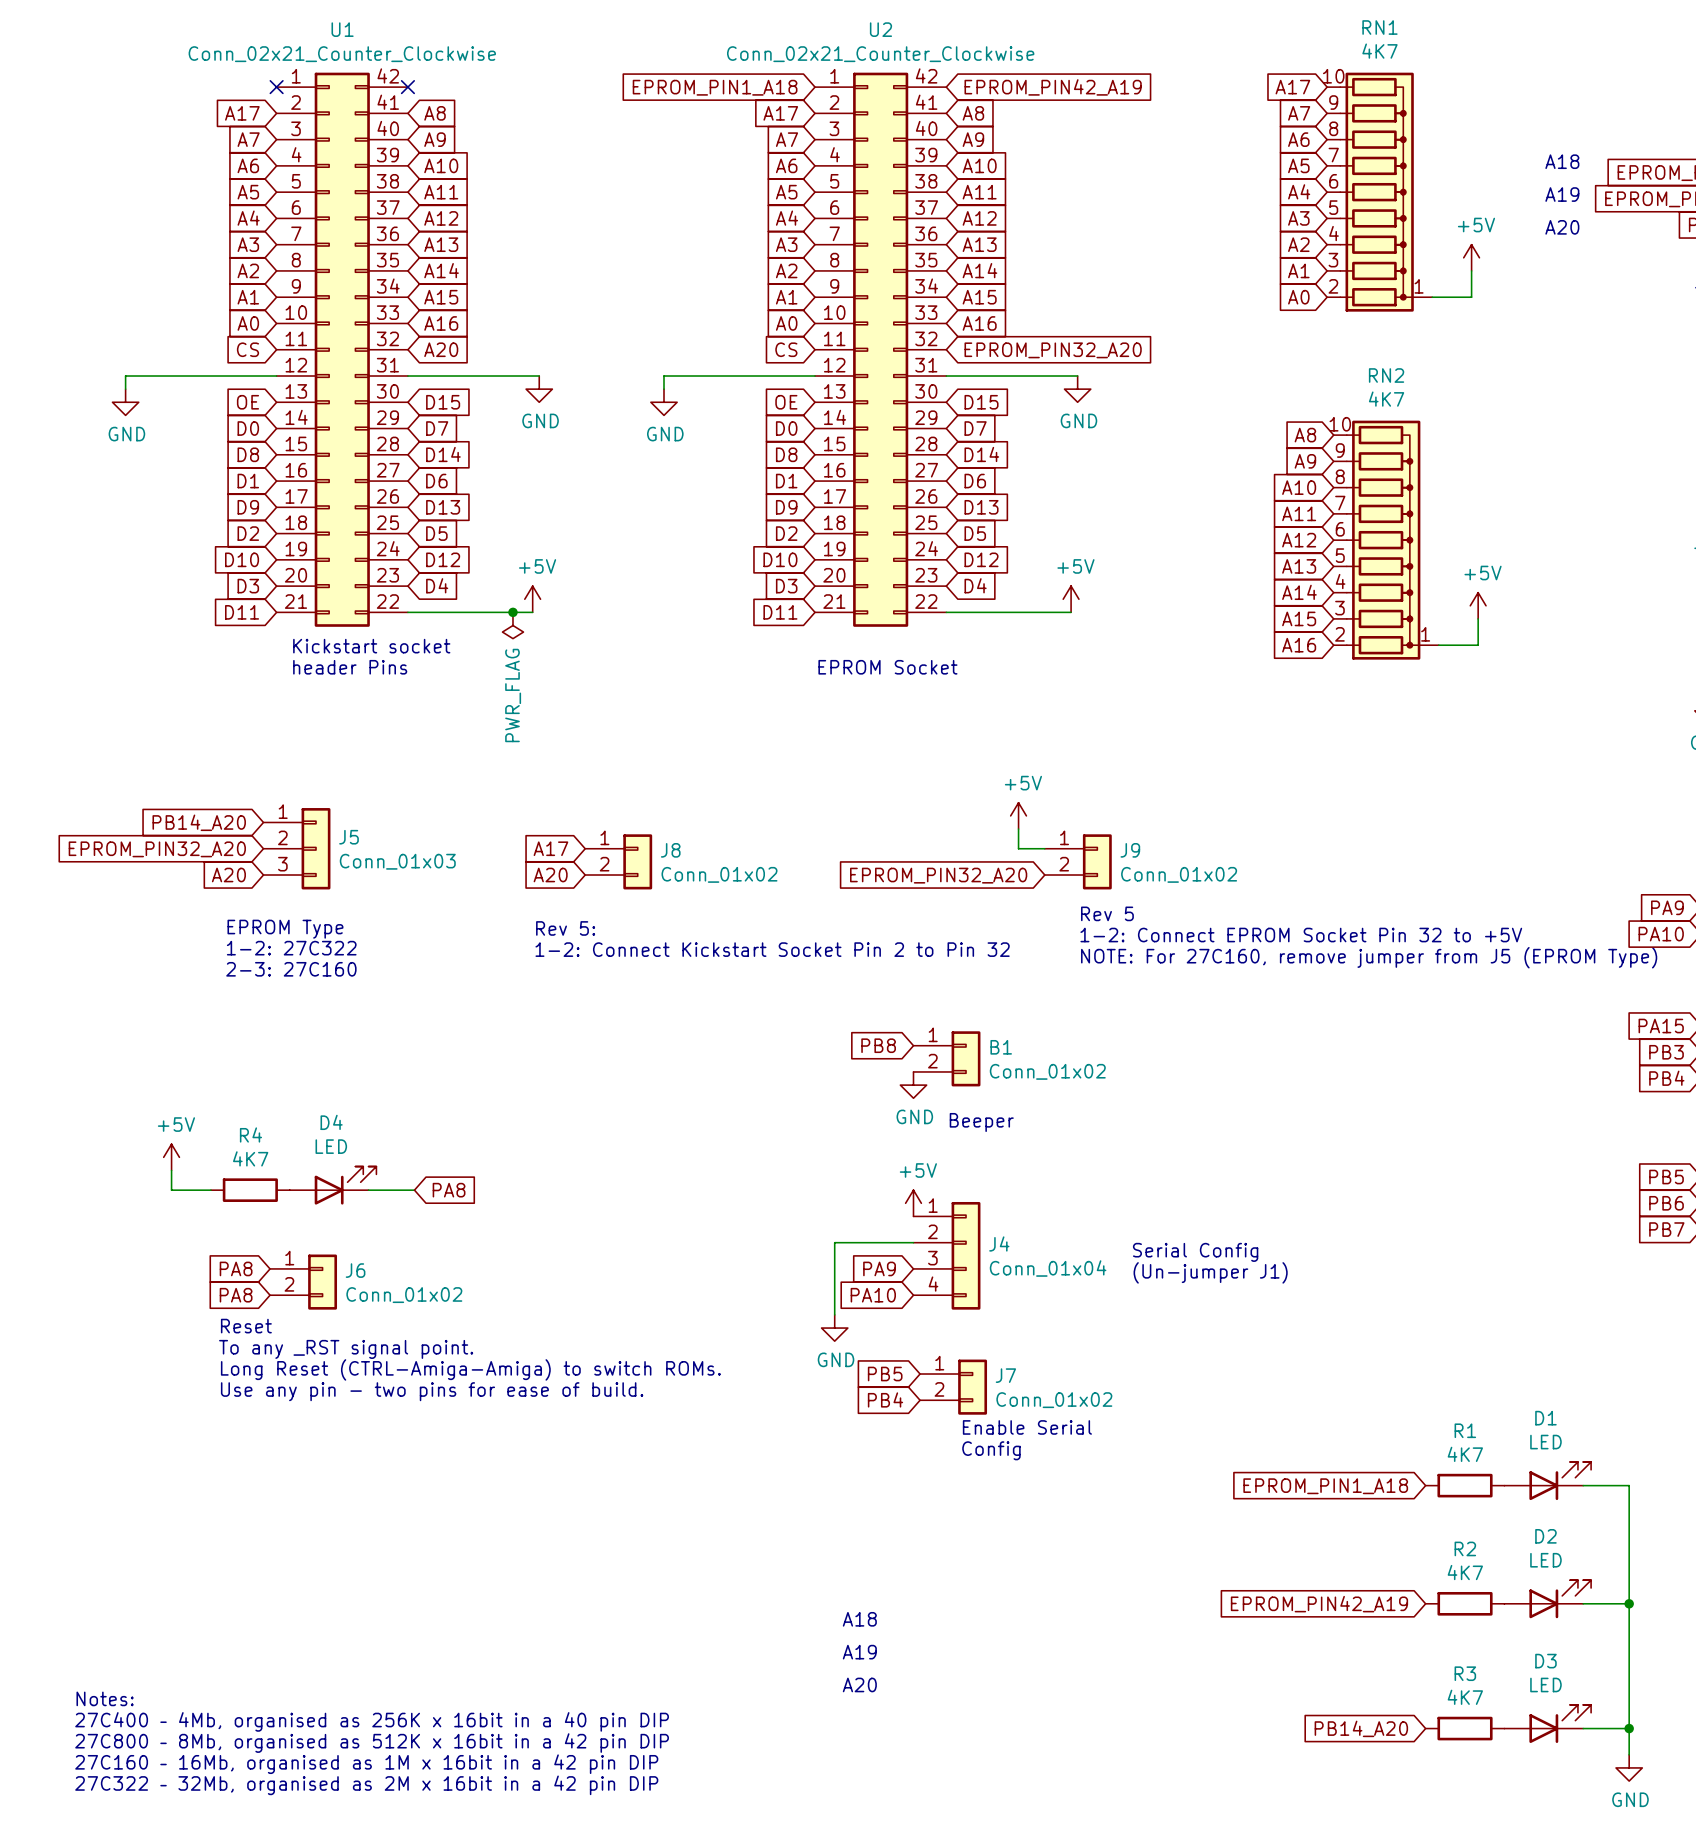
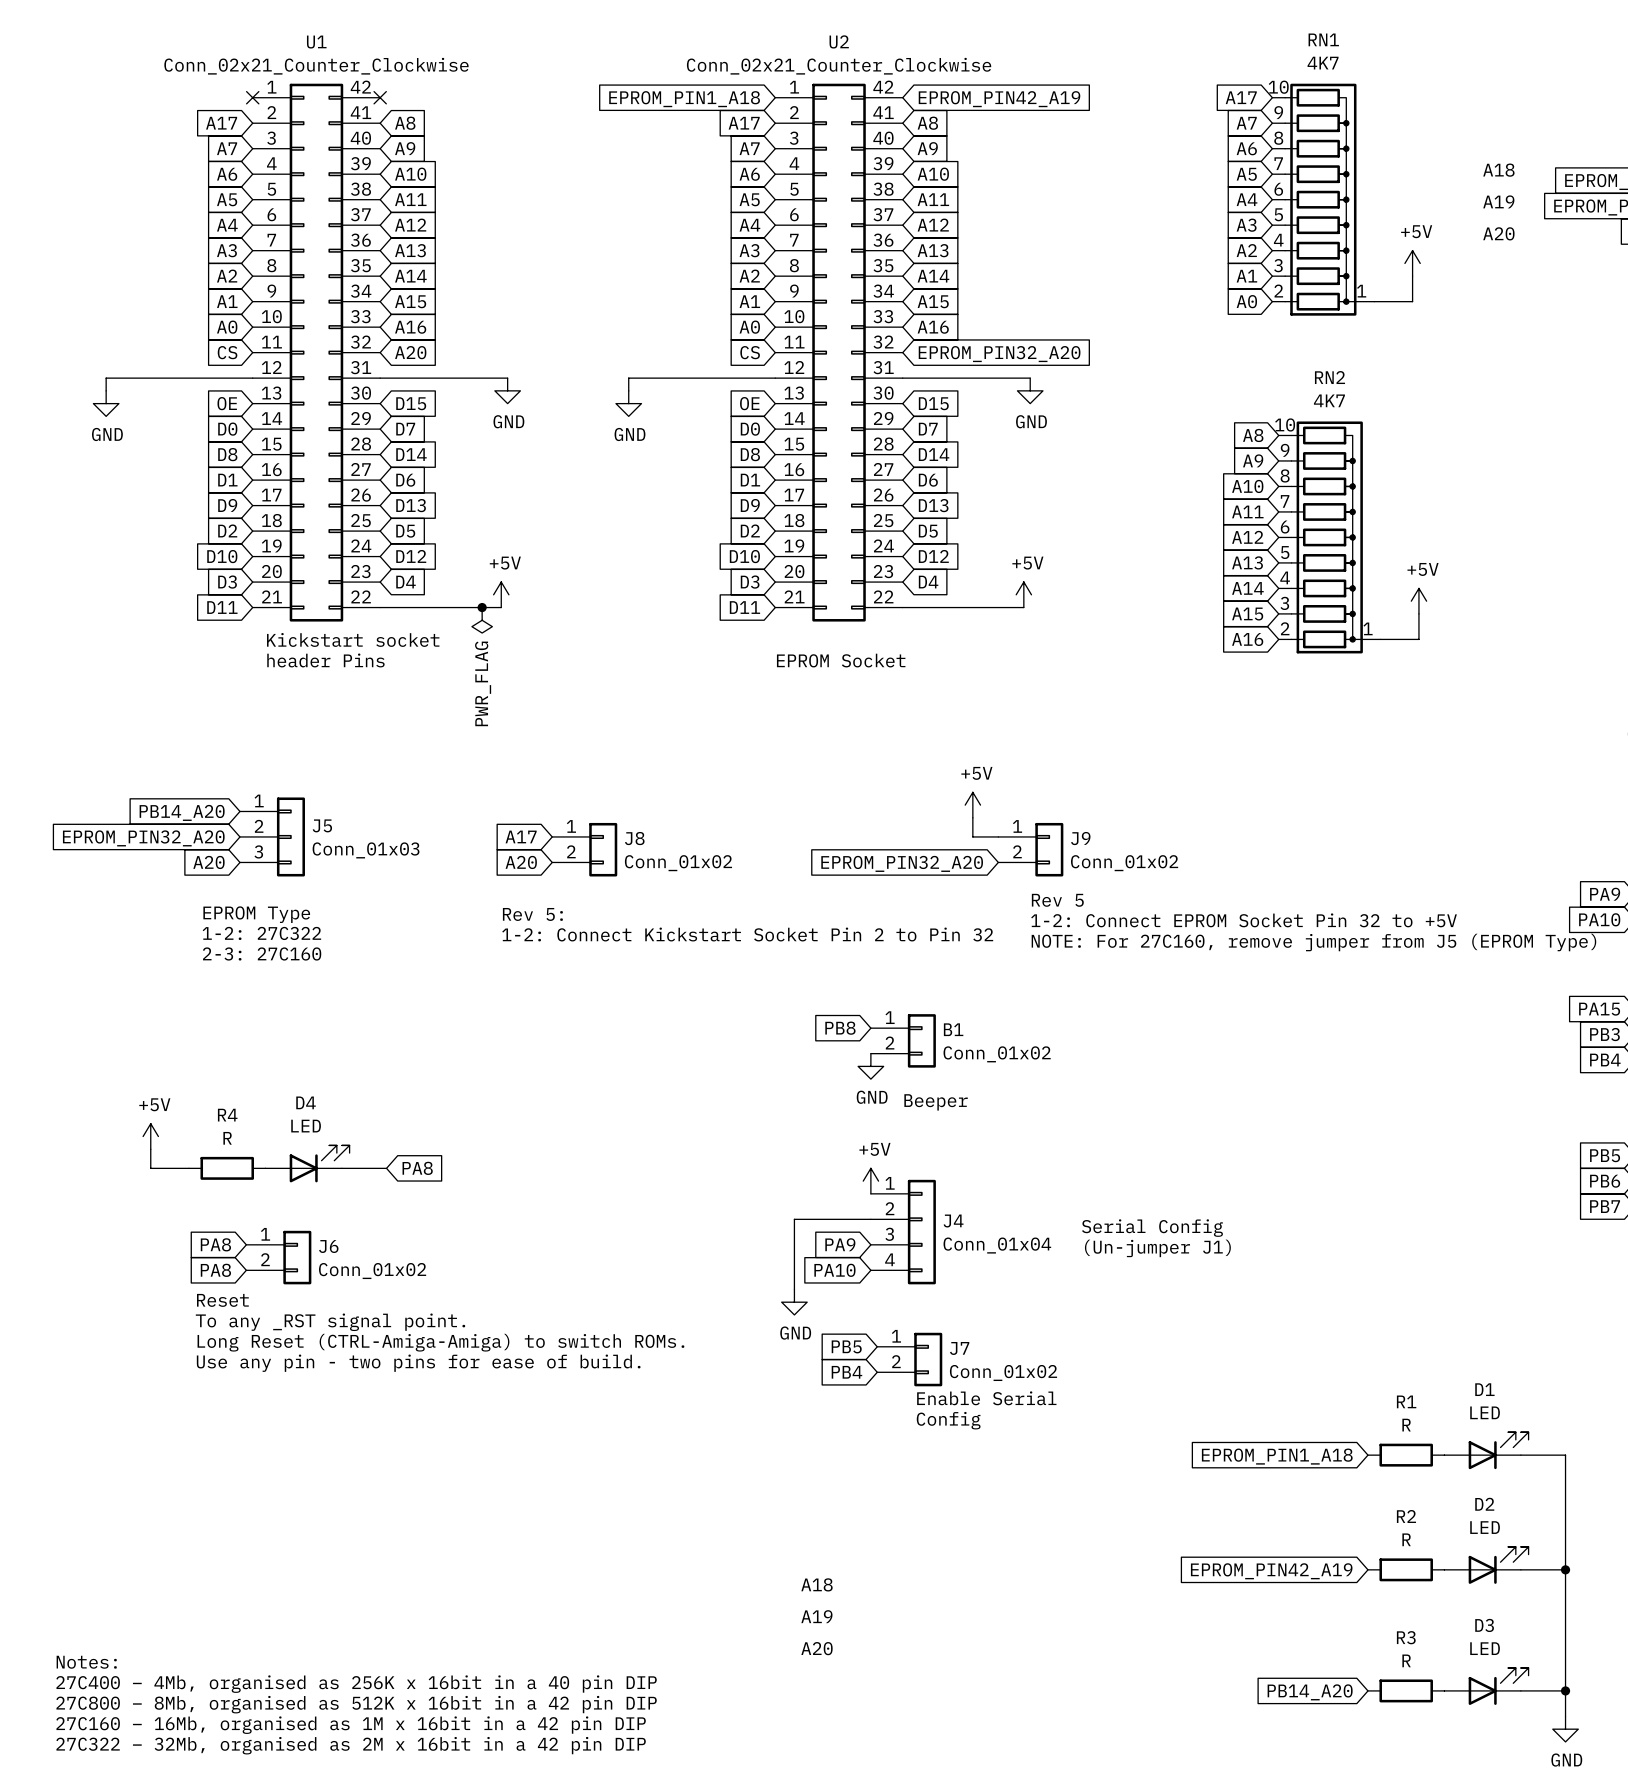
R4 value: 4K7 (250, 1158) -> R (227, 1138)
R1 value: 4K7 (1465, 1454) -> R (1406, 1425)
R2 value: 4K7 (1465, 1572) -> R (1406, 1539)
R3 value: 4K7 (1465, 1697) -> R (1406, 1660)

